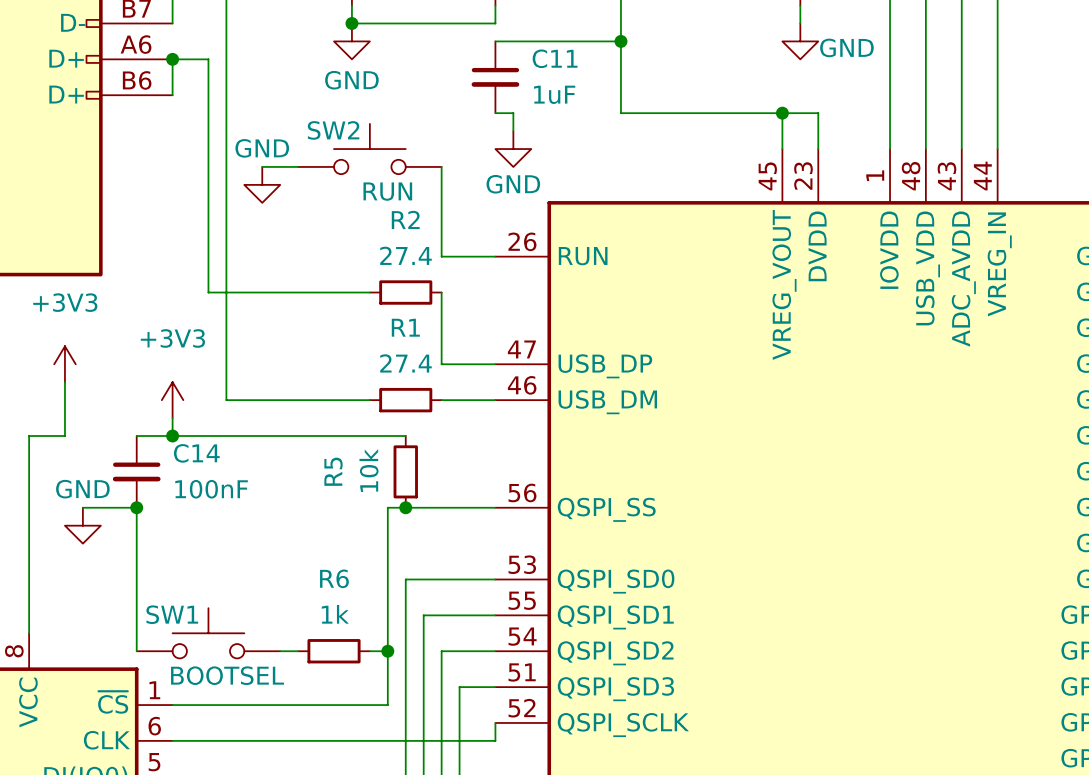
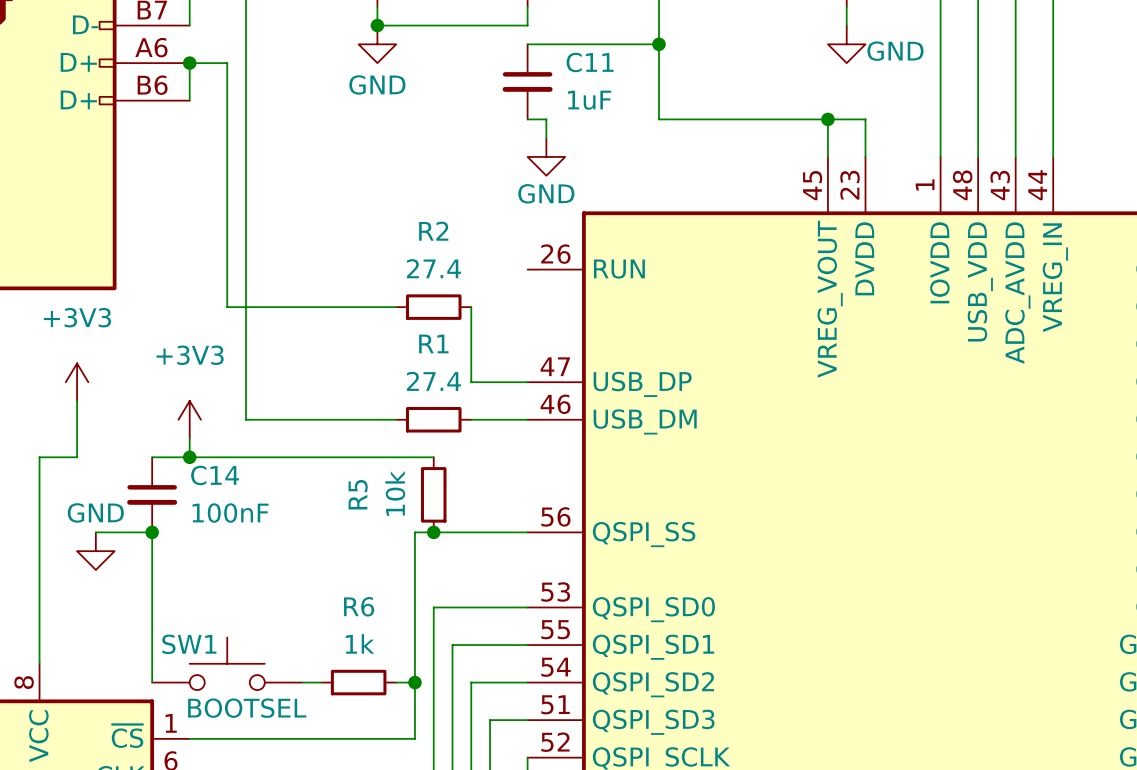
SW2: RUN (369, 149) -> none
wire: (262, 166) (298, 166) -> none
wire: (441, 166) (441, 256) (495, 256) -> none
power symbol: GND (262, 184) -> none

